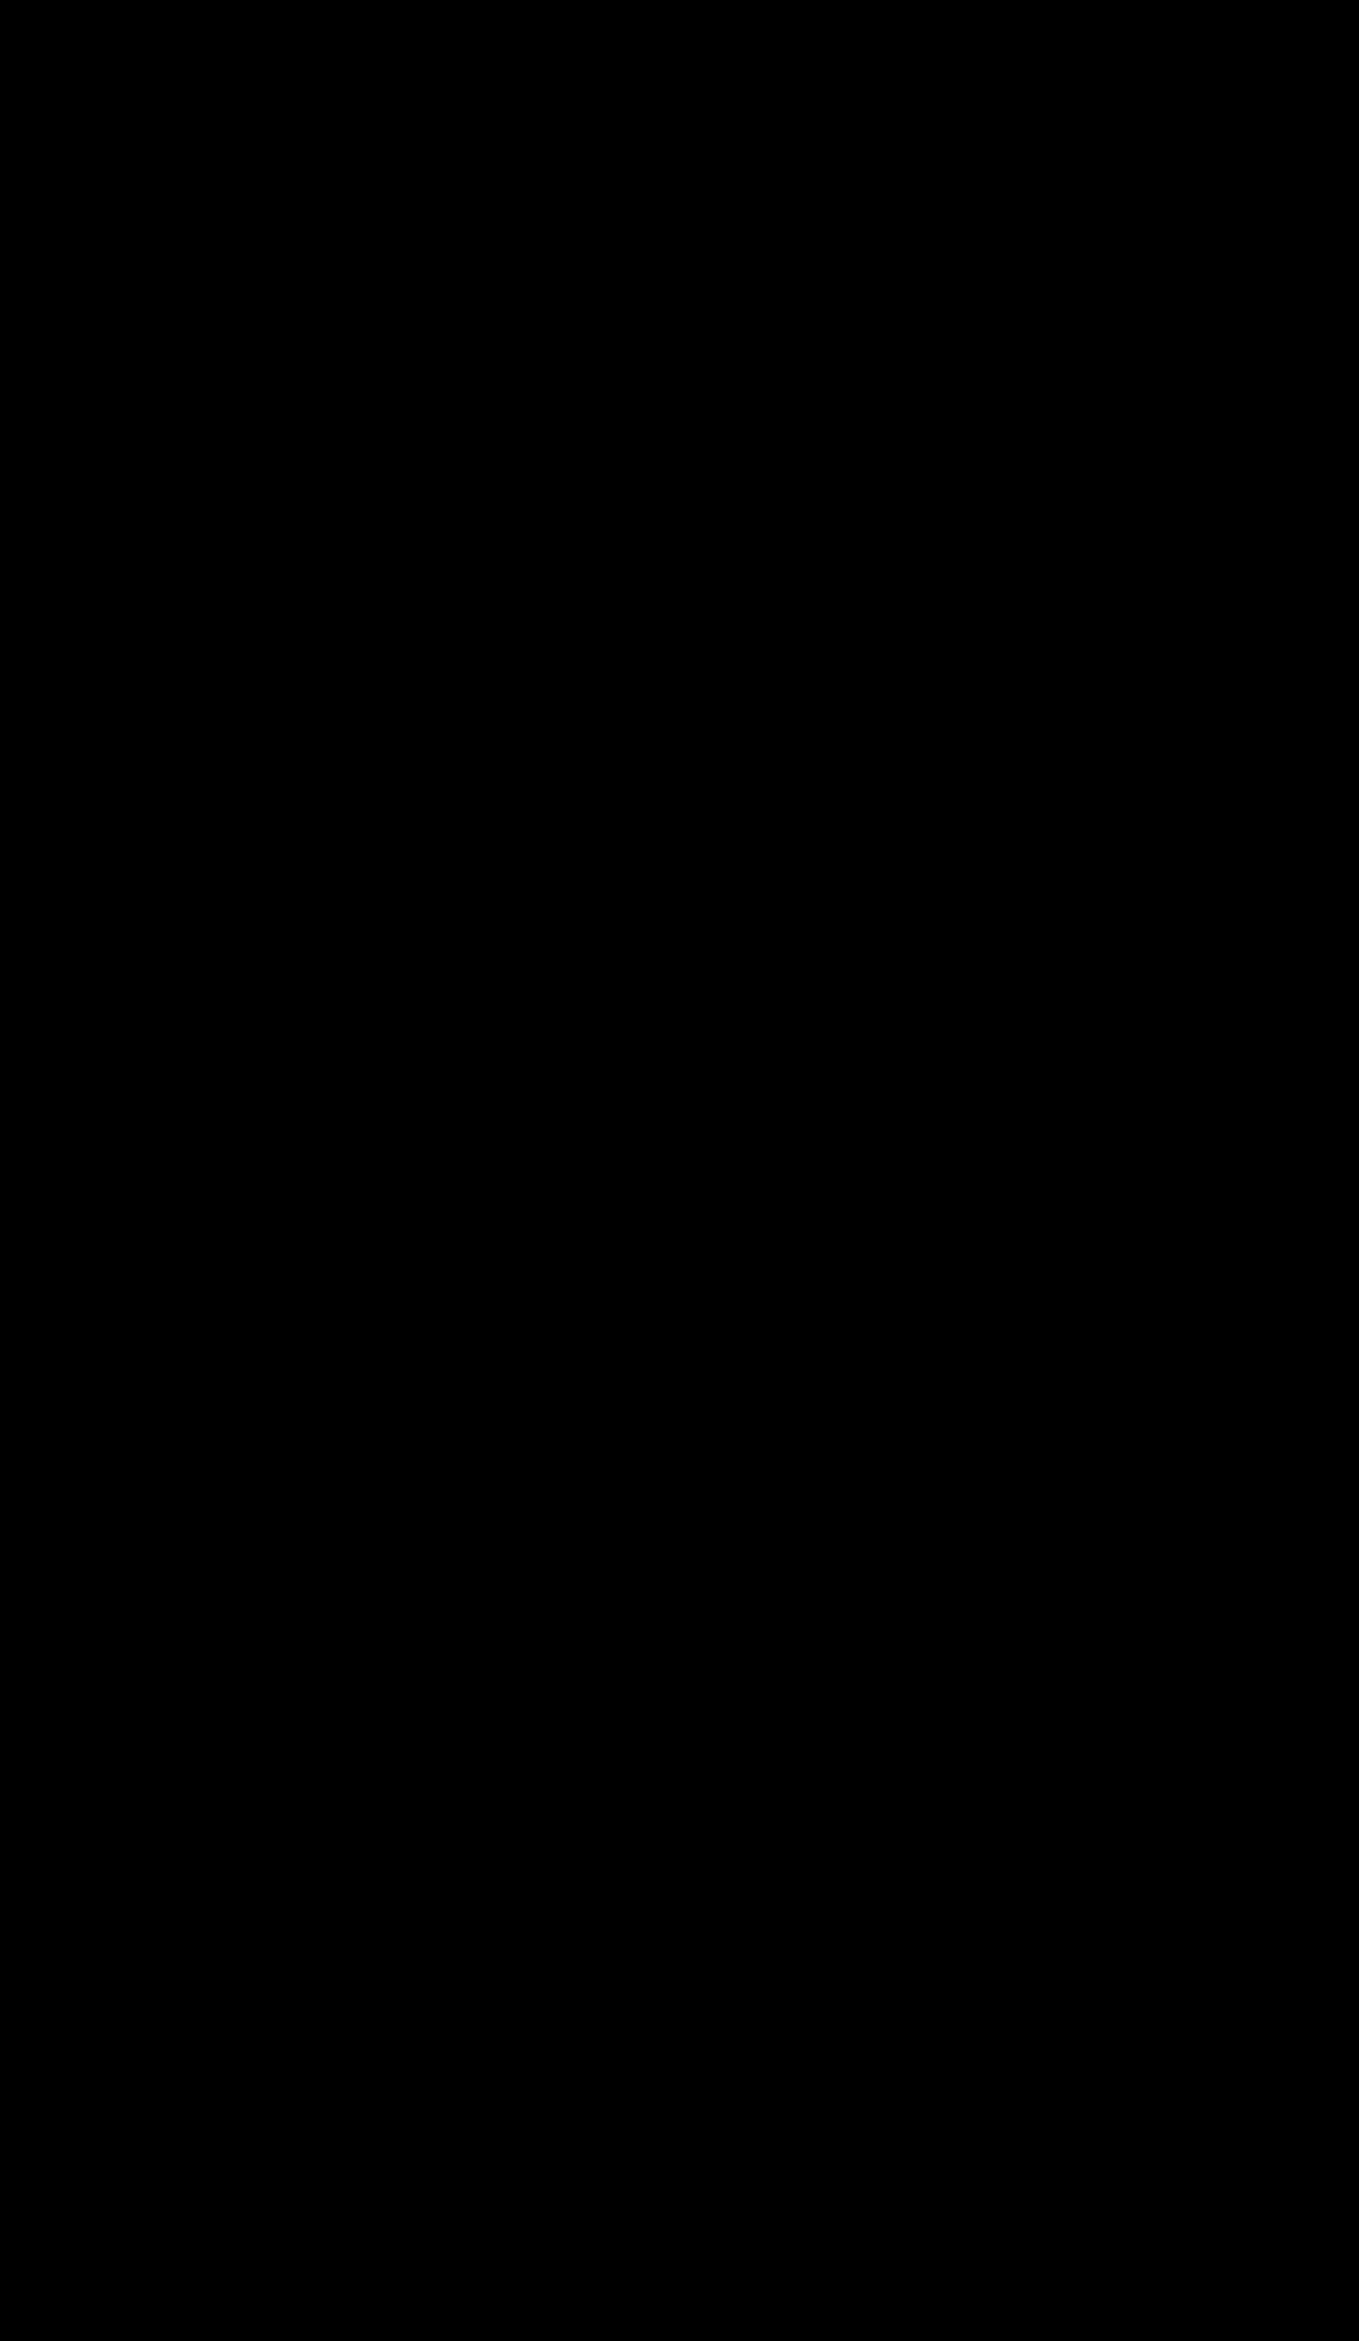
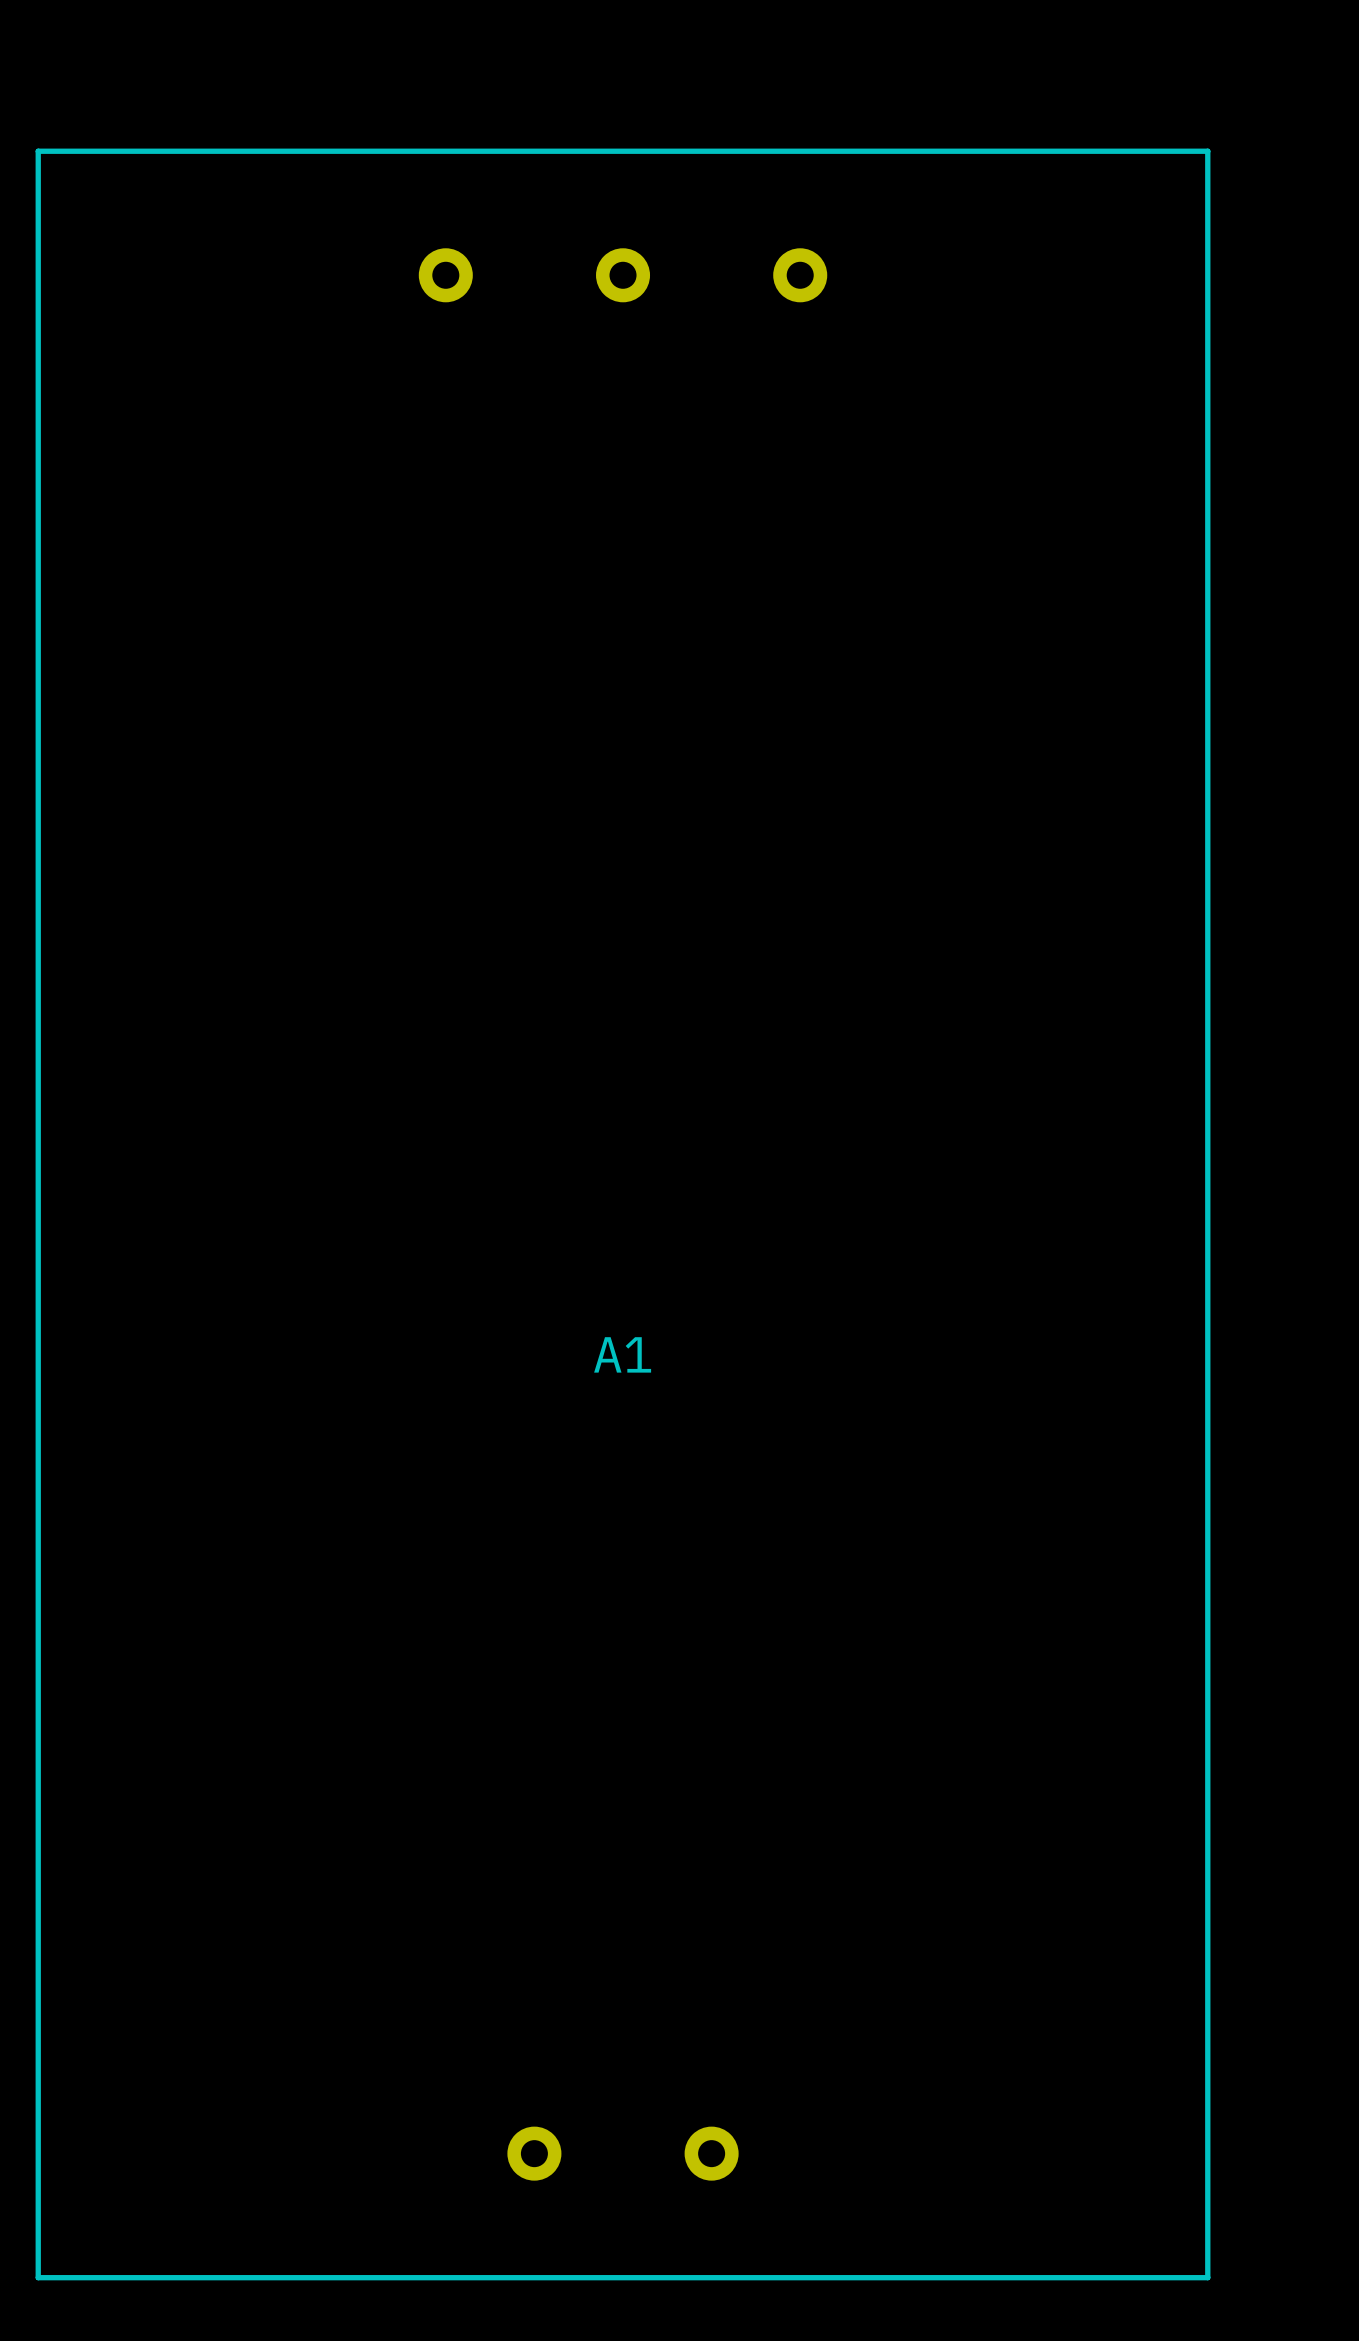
A1: none -> (623, 1214)

